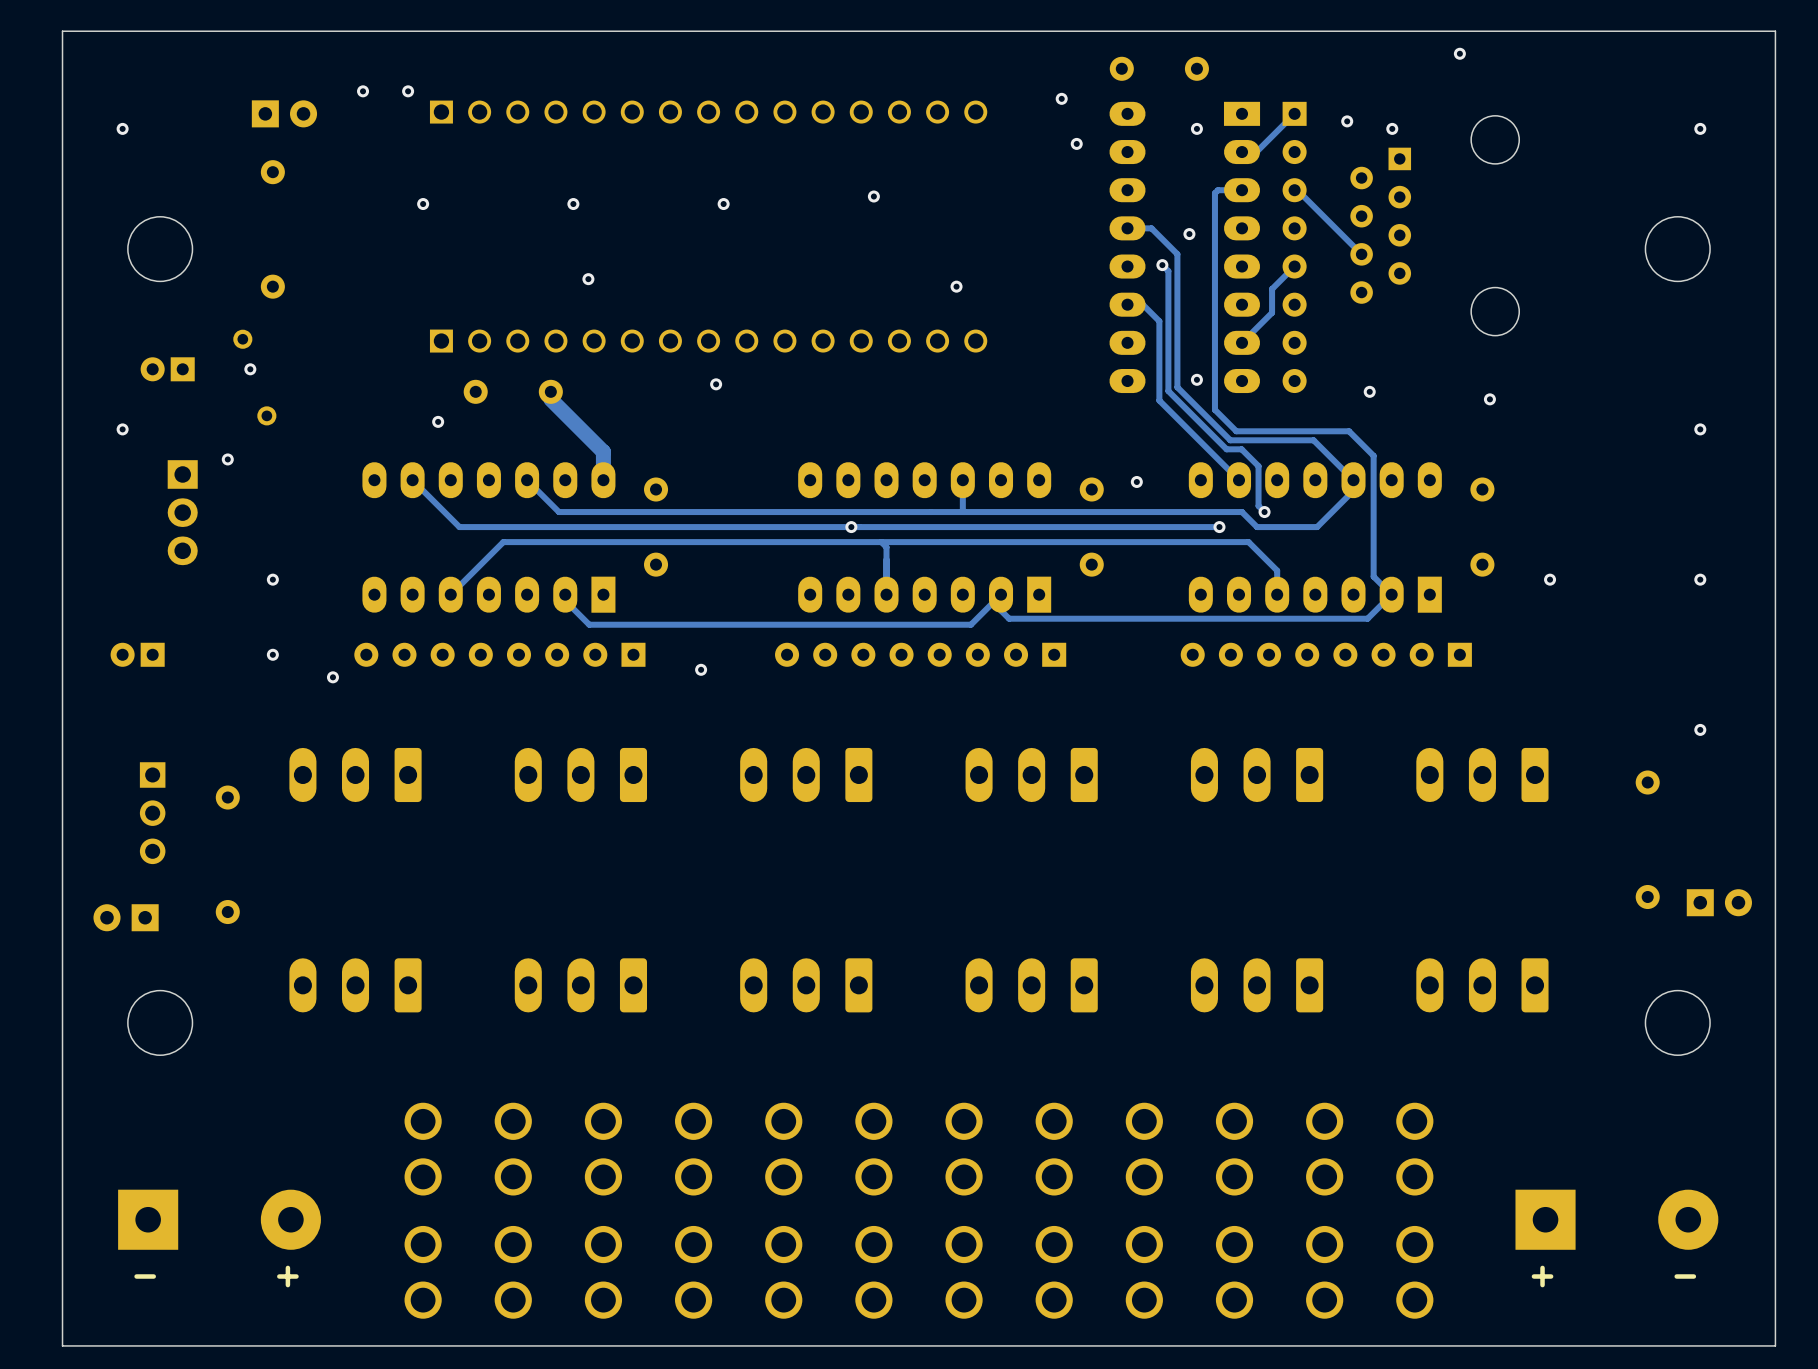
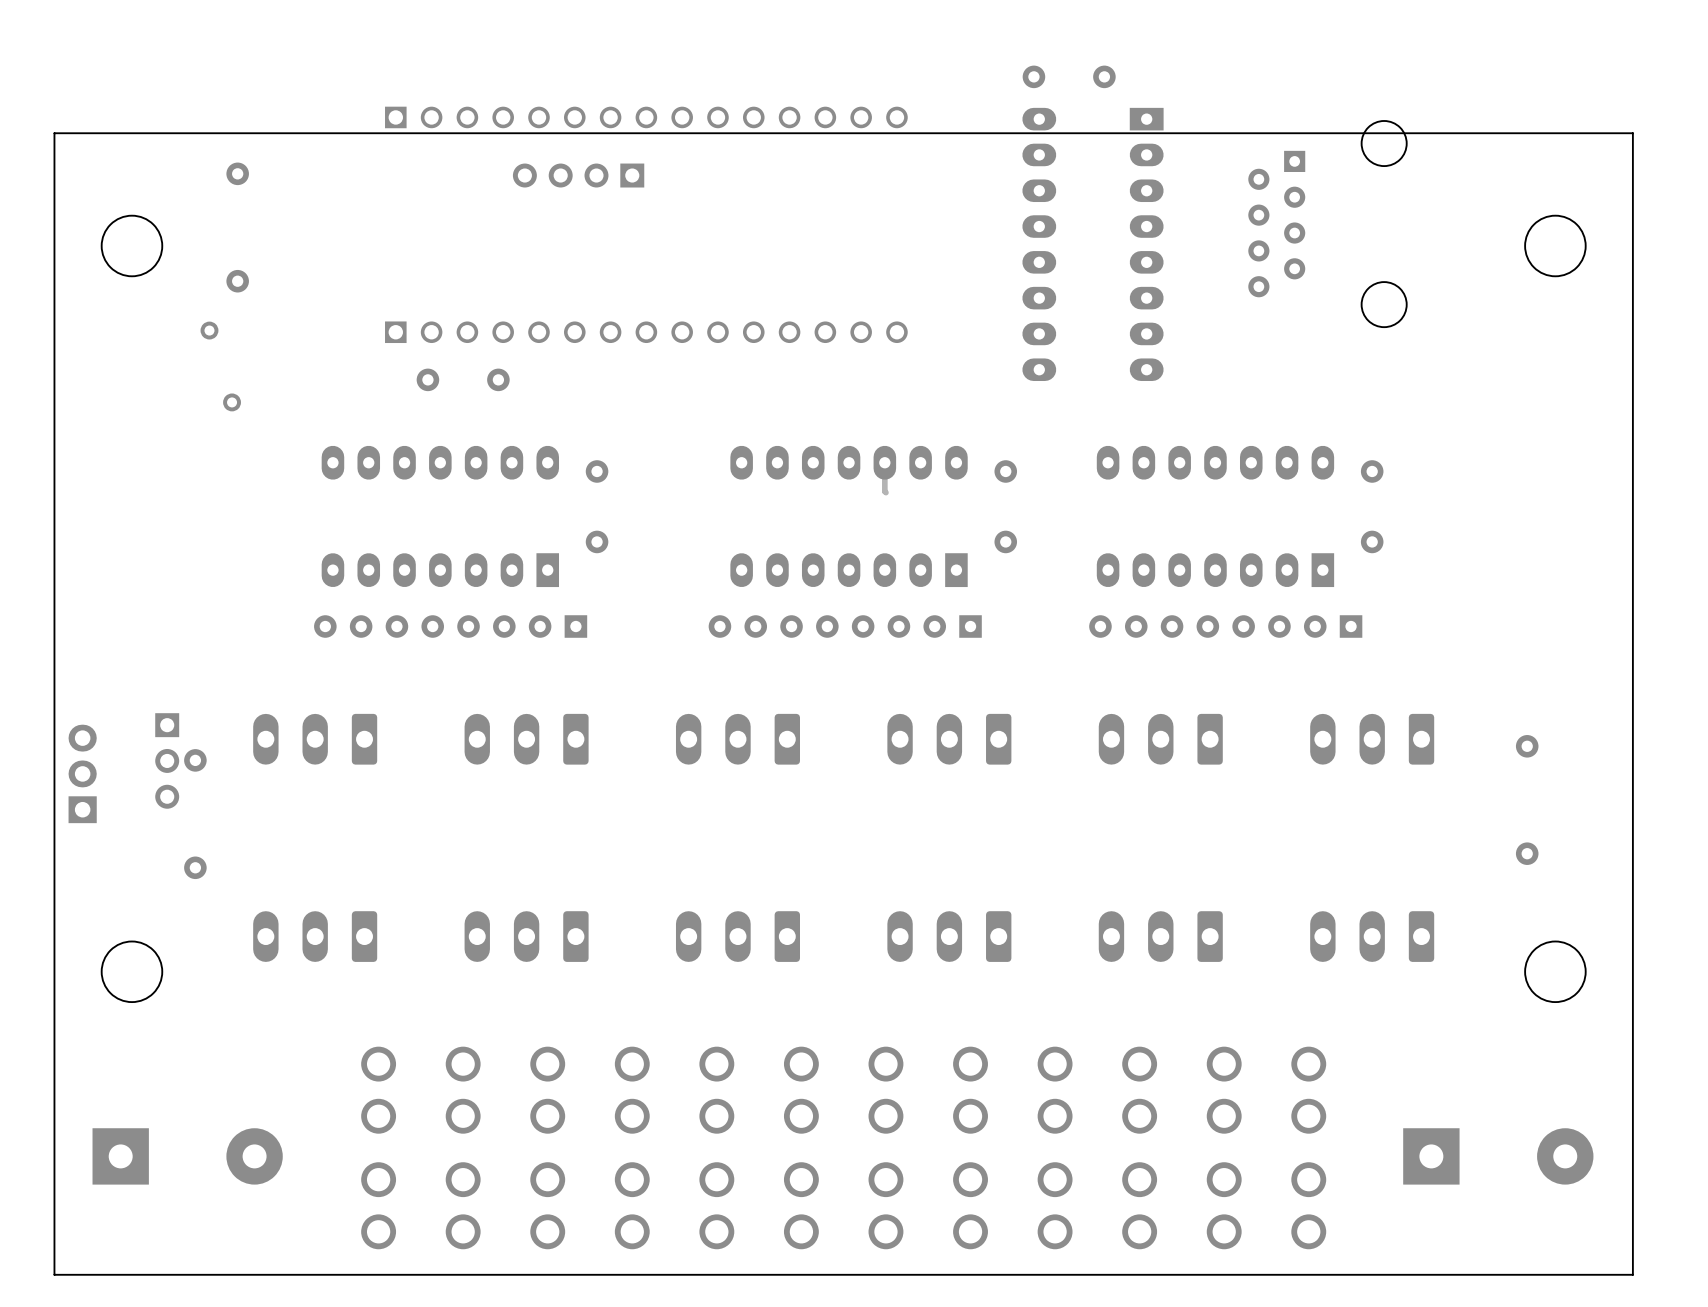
via: (1459, 53) -> none
via: (363, 91) -> none
via: (408, 91) -> none
via: (1061, 98) -> none
part: (284, 113) -> none
track: (1294, 113) (1256, 152) -> none
via: (1347, 121) -> none
via: (122, 128) -> none
via: (1196, 128) -> none
via: (1392, 128) -> none
via: (1700, 128) -> none
via: (1076, 143) -> none
part: none -> (578, 175)
track: (1242, 190) (1217, 190) (1214, 193) (1214, 409) (1236, 431) (1349, 431) (1373, 455) (1373, 576) (1391, 594) (1367, 618) (1009, 618) (1001, 610) (1001, 594) (970, 624) (589, 624) (565, 600) (565, 594) -> none
track: (1294, 190) (1297, 190) (1361, 254) -> none
via: (873, 196) -> none
via: (423, 204) -> none
via: (573, 204) -> none
via: (723, 204) -> none
track: (1127, 228) (1151, 228) (1177, 254) (1177, 387) (1230, 440) (1313, 440) (1353, 480) -> none
via: (1189, 234) -> none
part: (1294, 247) -> none
track: (1162, 265) (1168, 271) (1168, 391) (1226, 449) (1241, 449) (1258, 466) (1258, 506) (1264, 512) -> none
via: (1162, 265) -> none
track: (1294, 266) (1272, 289) (1272, 312) (1242, 341) -> none
via: (588, 279) -> none
via: (956, 286) -> none
track: (1127, 304) (1142, 304) (1159, 321) (1159, 400) (1239, 480) -> none
part: (167, 369) -> none
via: (250, 369) -> none
via: (1196, 379) -> none
via: (716, 384) -> none
via: (1369, 391) -> none
track: (550, 399) (603, 451) (603, 480) -> none
via: (1489, 399) -> none
via: (438, 421) -> none
via: (122, 429) -> none
via: (1700, 429) -> none
via: (227, 459) -> none
track: (1353, 472) (1353, 490) (1317, 527) (1257, 527) (1242, 512) (558, 512) (527, 480) -> none
track: (412, 480) (459, 527) (1219, 527) -> none
via: (1136, 481) -> none
part rotation: 0° (182, 512) -> 180° (82, 773)
part position: (182, 512) -> (82, 773)
via: (1264, 512) -> none
via: (851, 527) -> none
via: (1219, 527) -> none
track: (881, 542) (886, 547) (886, 594) -> none
via: (272, 579) -> none
via: (1550, 579) -> none
via: (1700, 579) -> none
track: (1277, 594) (1277, 570) (1248, 542) (503, 542) (450, 594) -> none
part: (137, 654) -> none
via: (272, 654) -> none
via: (701, 669) -> none
via: (332, 677) -> none
via: (1700, 729) -> none
part position: (152, 813) -> (167, 760)
part: (1719, 902) -> none
part: (126, 917) -> none
text: - (145, 1276) -> none
text: + (287, 1276) -> none
text: + (1542, 1276) -> none
text: - (1685, 1276) -> none
board edge: (1760, 1345) (1775, 1345) (1775, 31) (62, 31) (62, 1345) (77, 1345) -> (1632, 1274) (1632, 133) (54, 133) (54, 1274)

